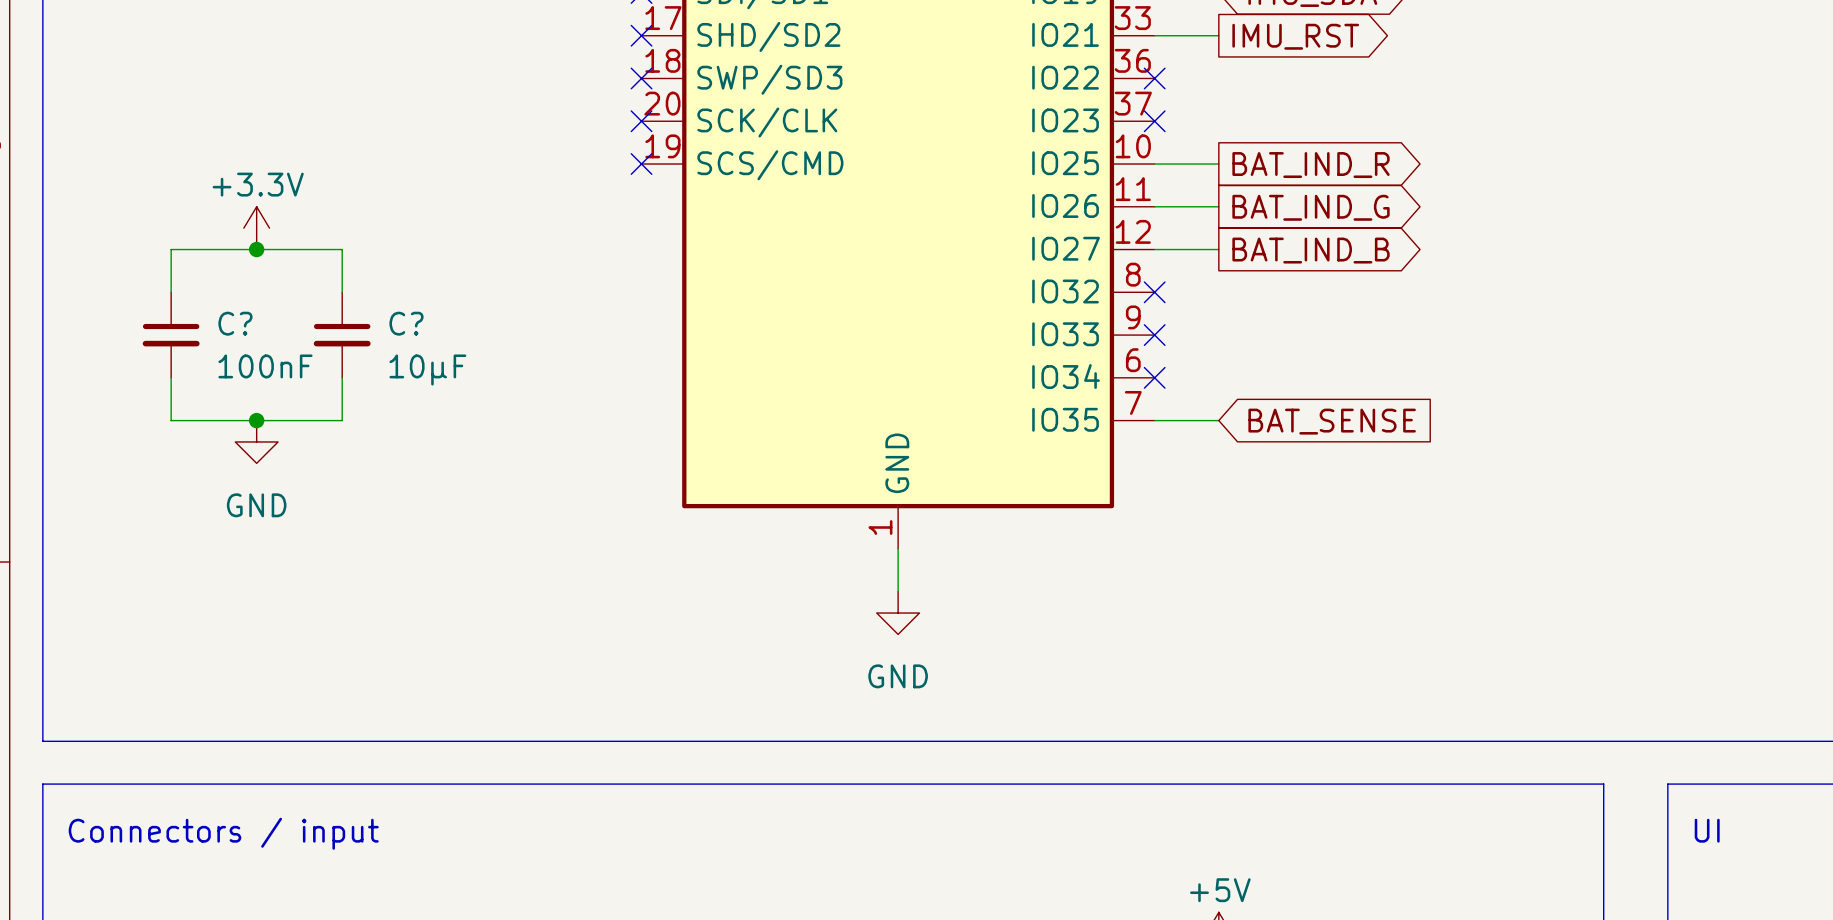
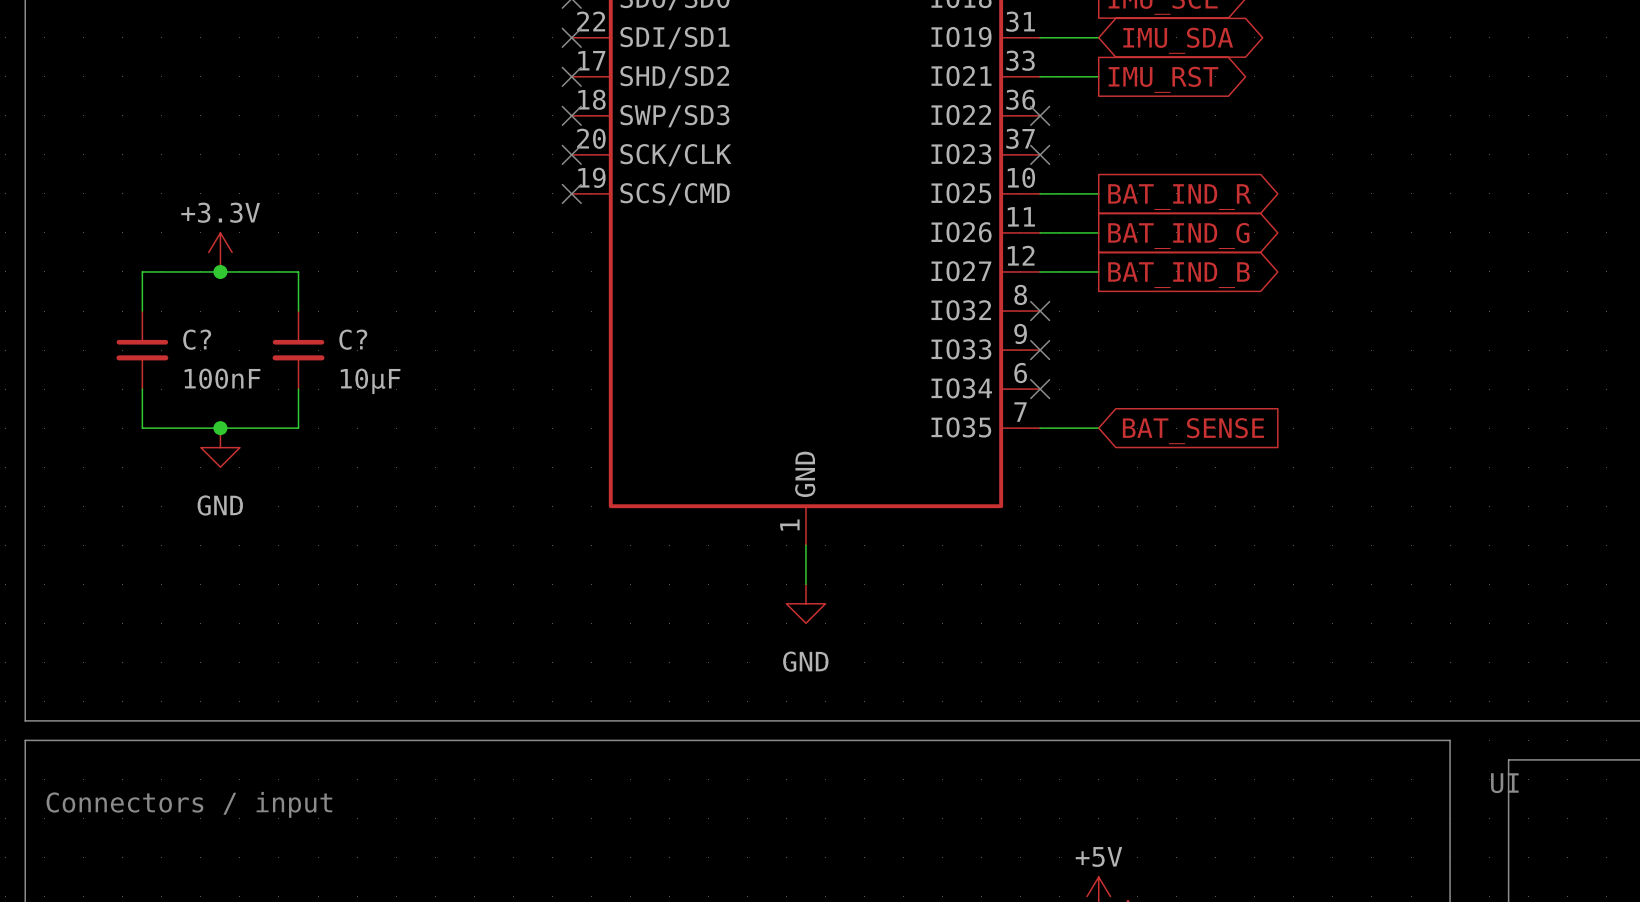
line: (42, 784) (1603, 784) -> (25, 759) (25, 740) (1450, 740) (1450, 759)
text position: UI (1707, 830) -> UI (1504, 783)

